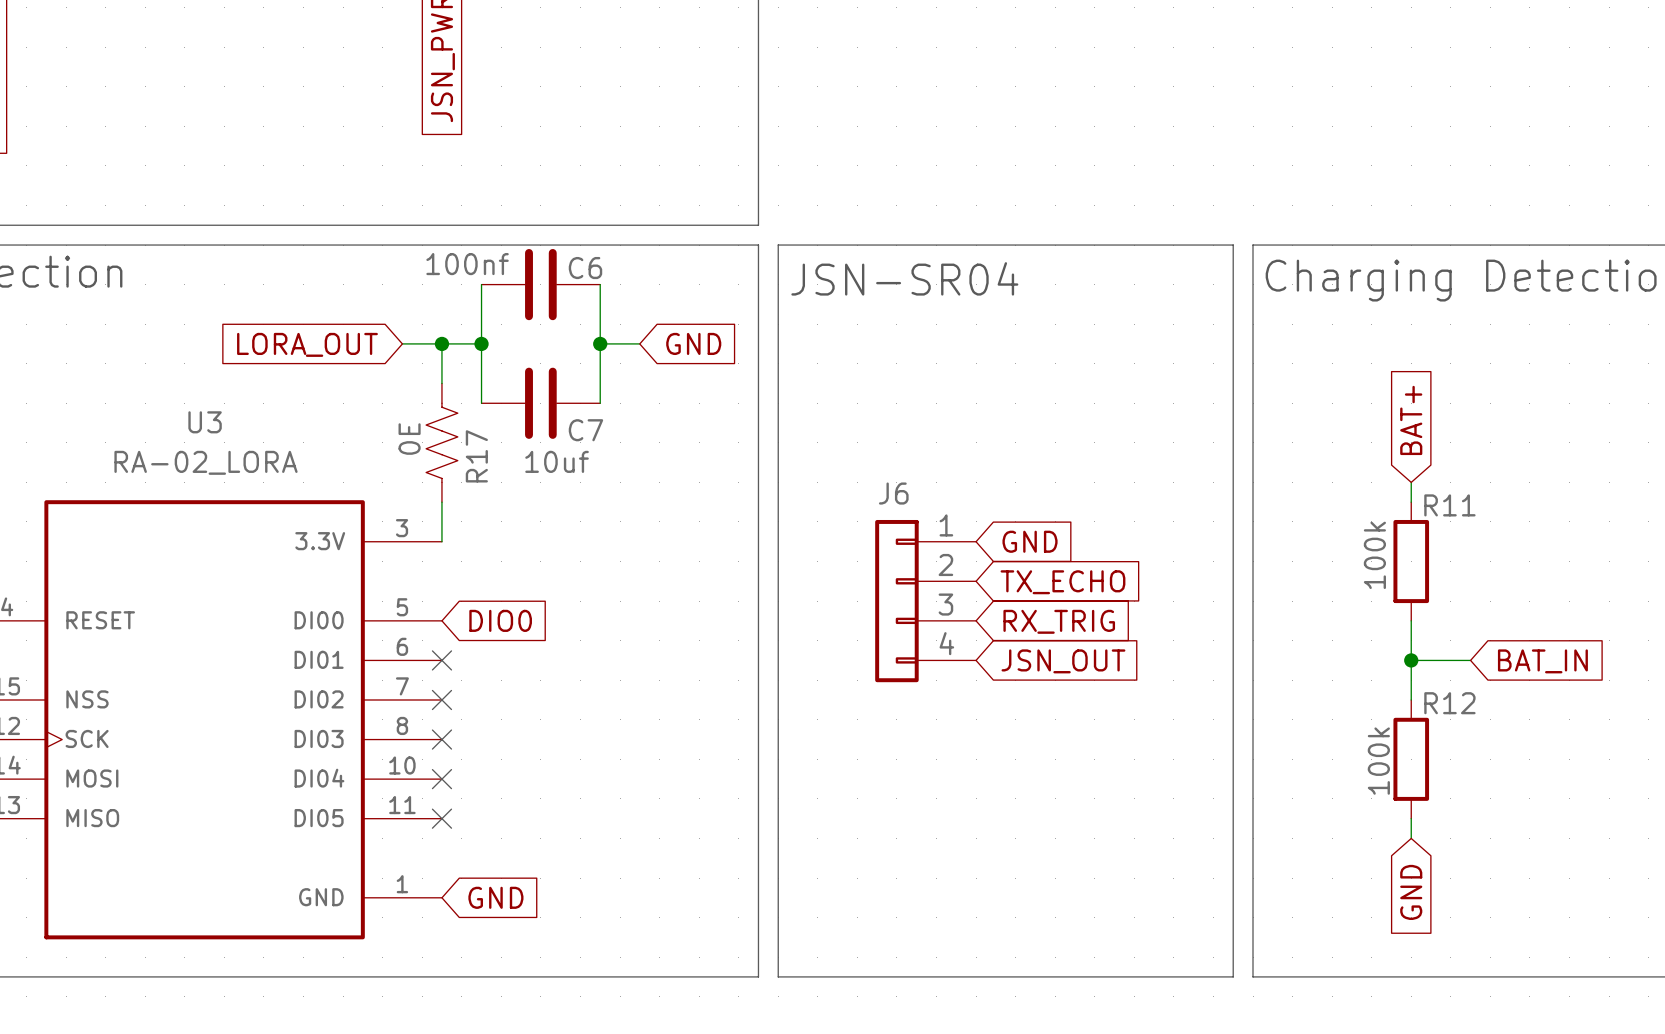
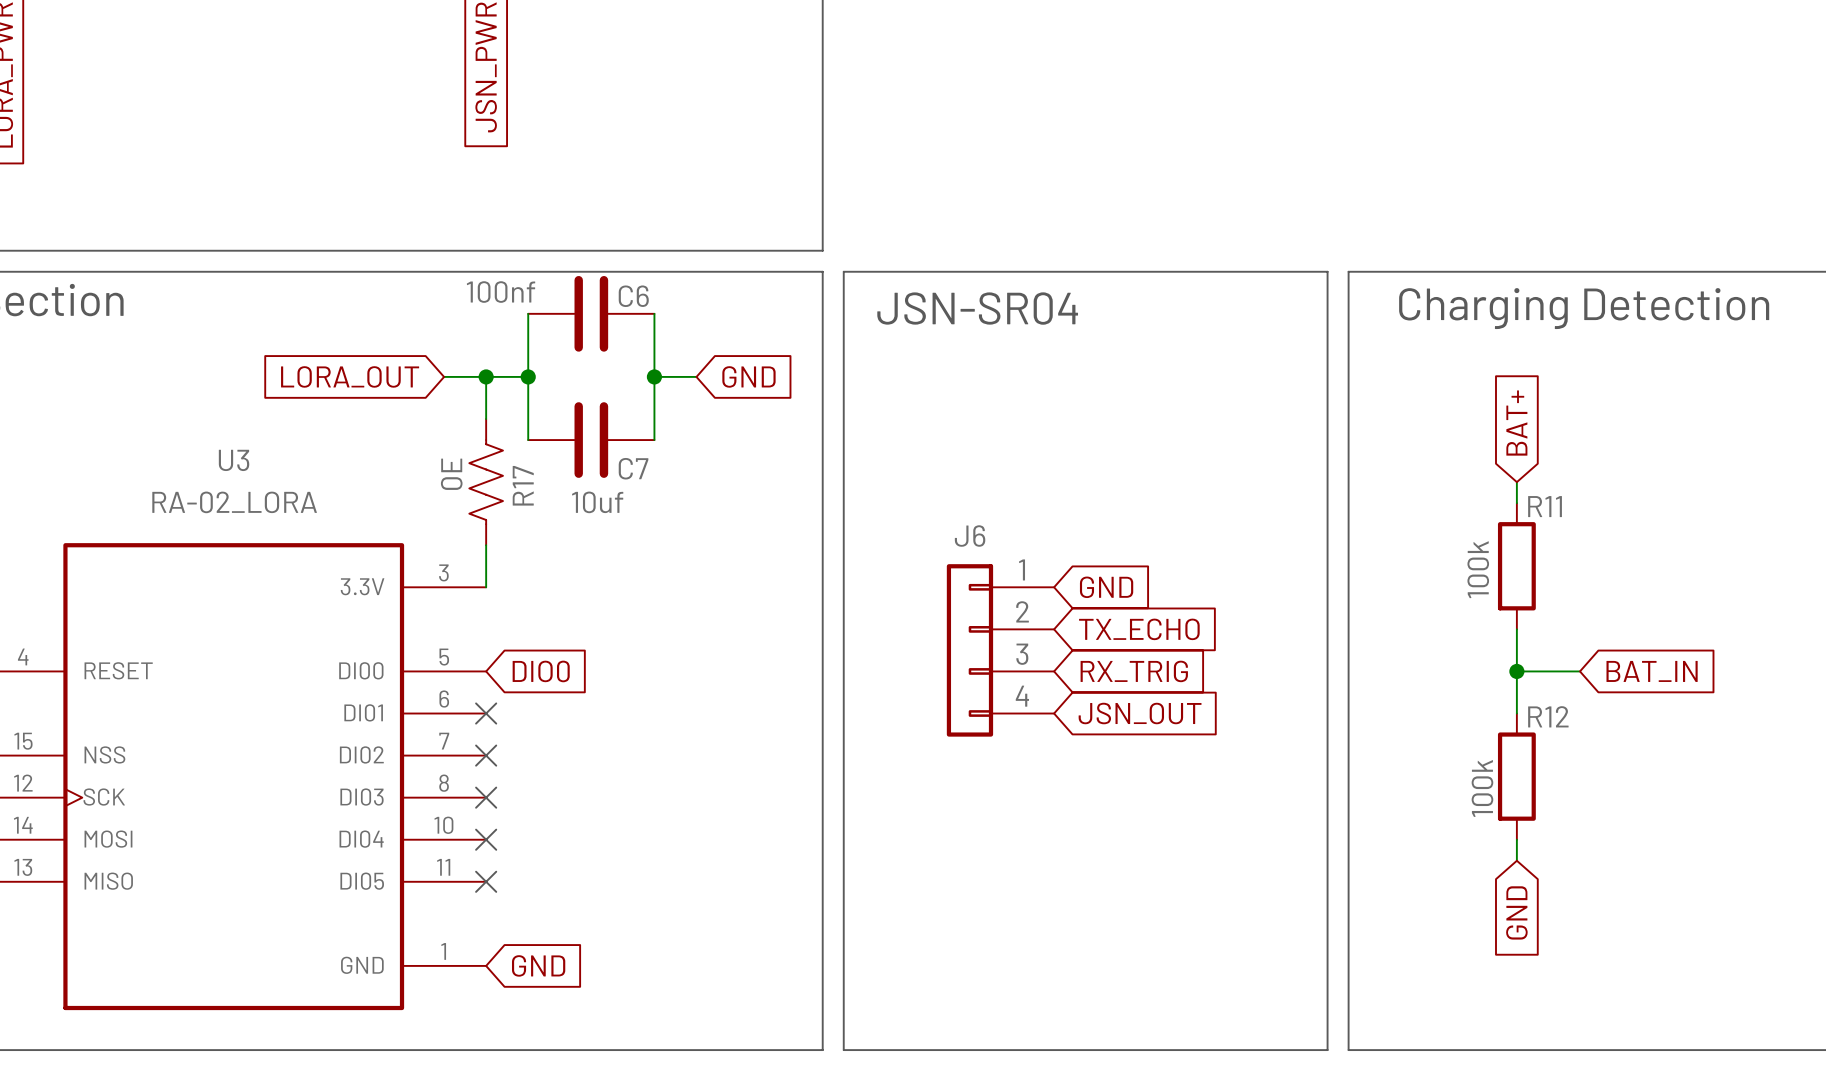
global label position: BAT+ (1411, 420) -> BAT+ (1516, 423)
wire: (1411, 482) (1411, 502) -> (1516, 482) (1516, 503)
R11 position: (1411, 561) -> (1516, 566)
wire: none -> (1516, 629) (1516, 671) (1579, 671)
junction position: (1411, 660) -> (1516, 671)
wire: (1470, 660) (1411, 660) (1411, 699) -> none
global label position: BAT_IN (1542, 661) -> BAT_IN (1652, 671)
R12 position: (1411, 759) -> (1516, 776)
wire: (1411, 818) (1411, 838) -> (1516, 839) (1516, 860)
global label position: GND (1411, 892) -> GND (1516, 912)

